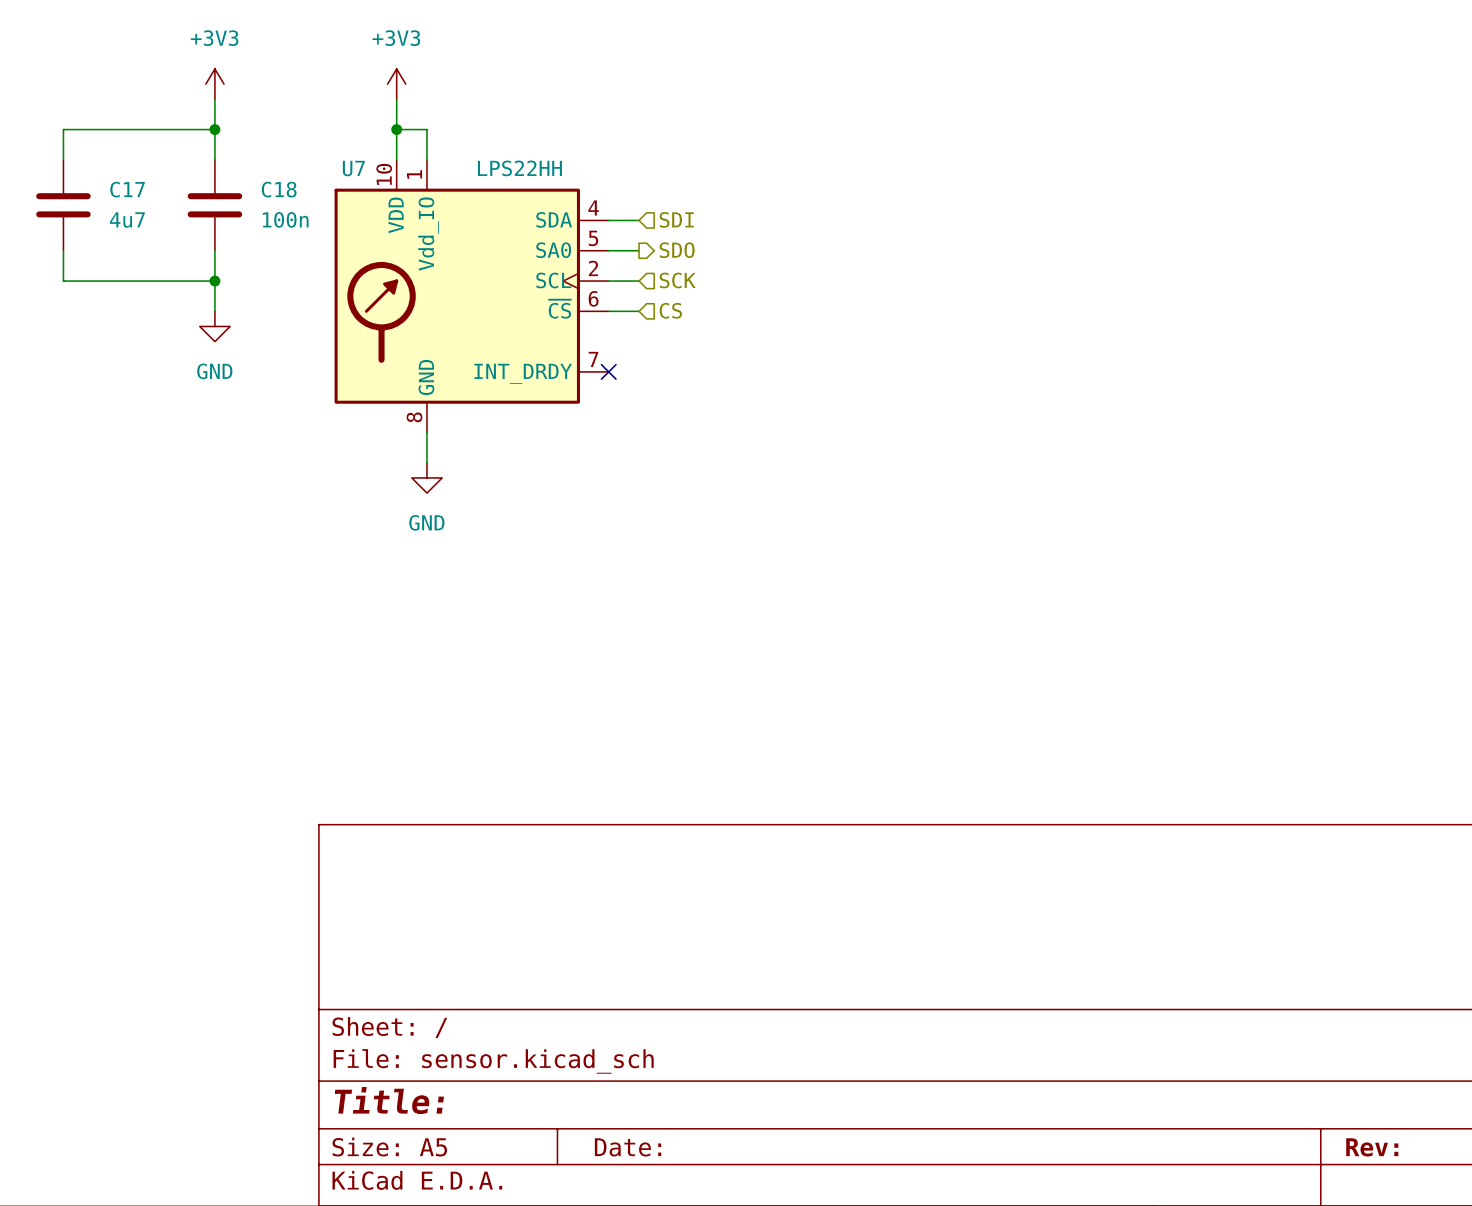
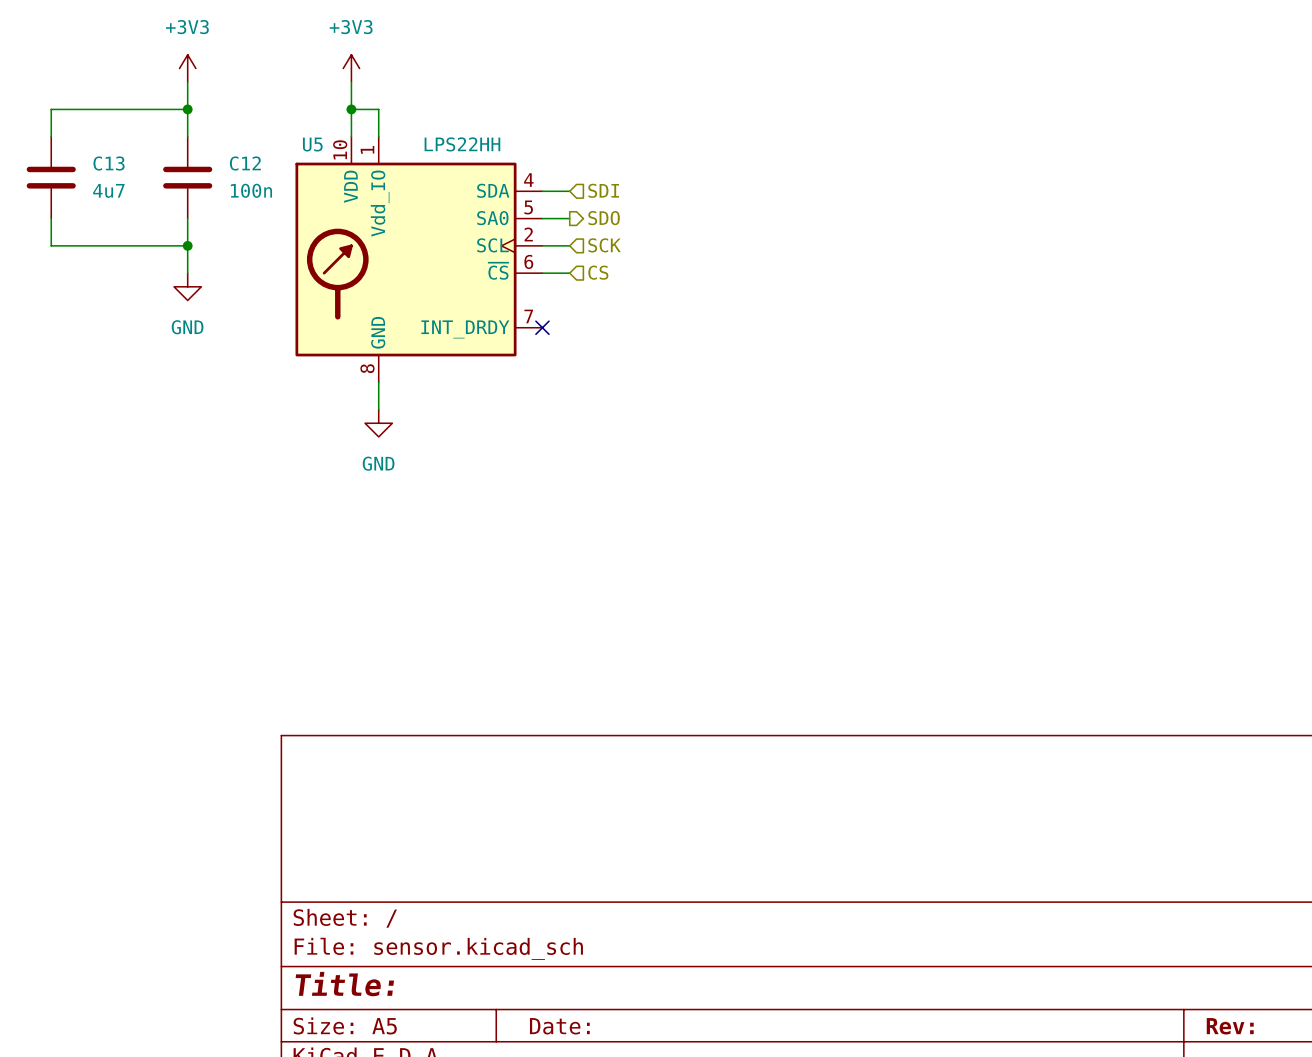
U7 name: U7 (353, 168) -> U5 (312, 144)
C17 name: C17 (127, 189) -> C13 (109, 163)
C18 name: C18 (279, 189) -> C12 (245, 163)

